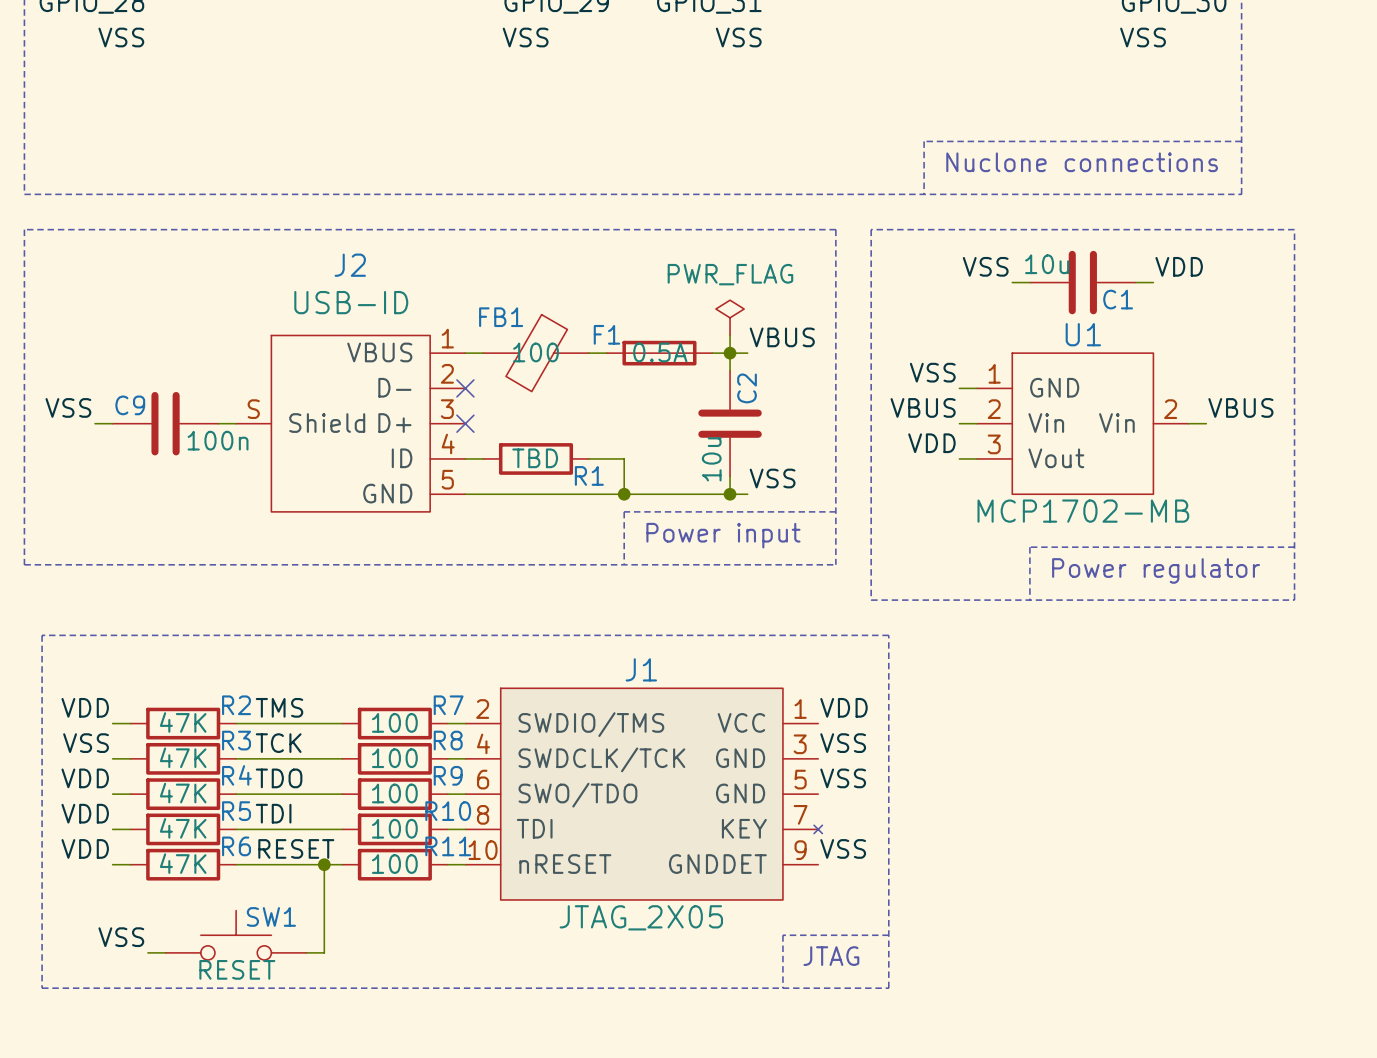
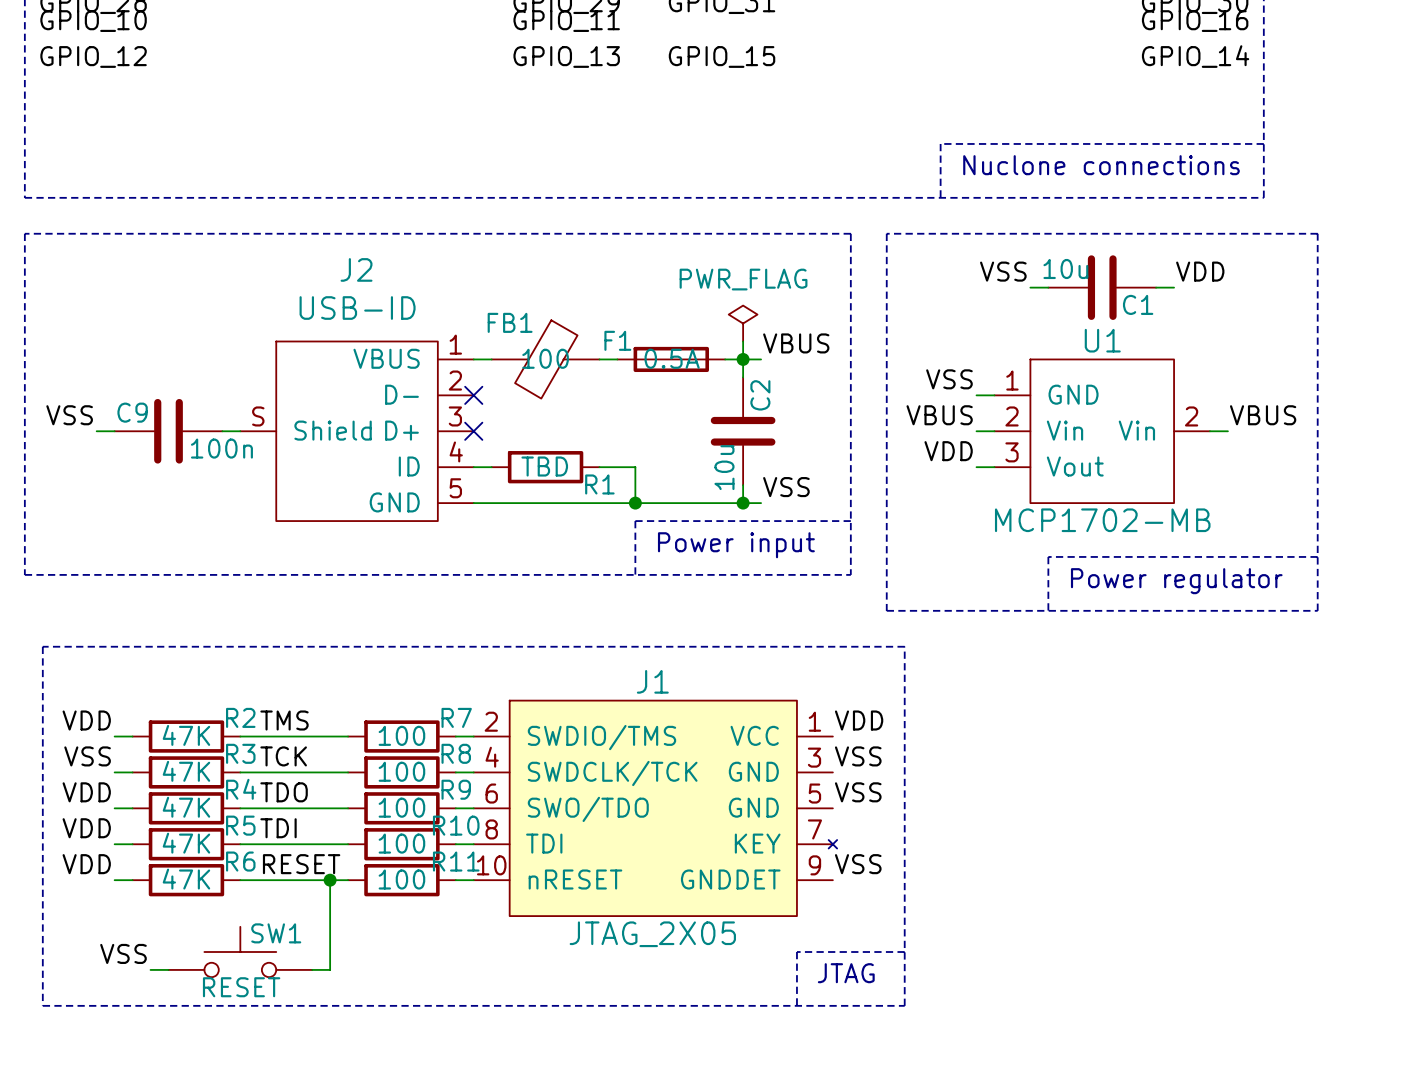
label: none -> GPIO_10 (93, 21)
label: none -> GPIO_11 (566, 21)
label: none -> GPIO_16 (1195, 21)
label: VSS (121, 37) -> none
label: VSS (525, 37) -> none
label: VSS (738, 37) -> none
label: VSS (1143, 37) -> none
label: none -> GPIO_12 (93, 56)
label: none -> GPIO_13 (566, 56)
label: none -> GPIO_15 (722, 56)
label: none -> GPIO_14 (1195, 56)

